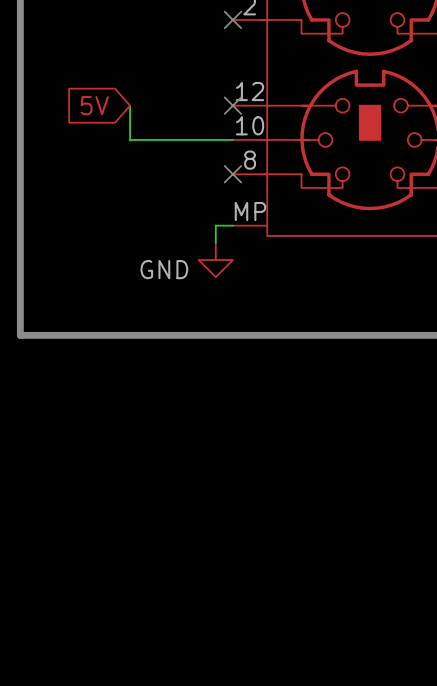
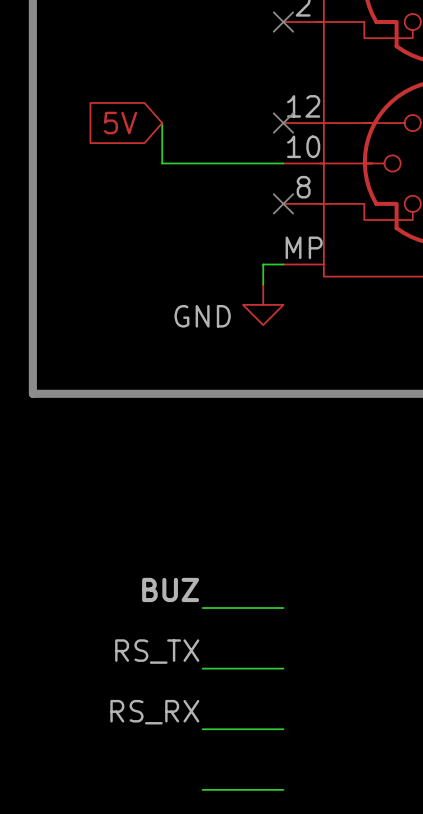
label: none -> BUZ (170, 589)
wire: none -> (202, 608) (283, 608)
label: none -> RS_TX (157, 651)
wire: none -> (202, 668) (283, 668)
label: none -> RS_RX (154, 712)
wire: none -> (202, 729) (283, 729)
wire: none -> (202, 789) (283, 789)

